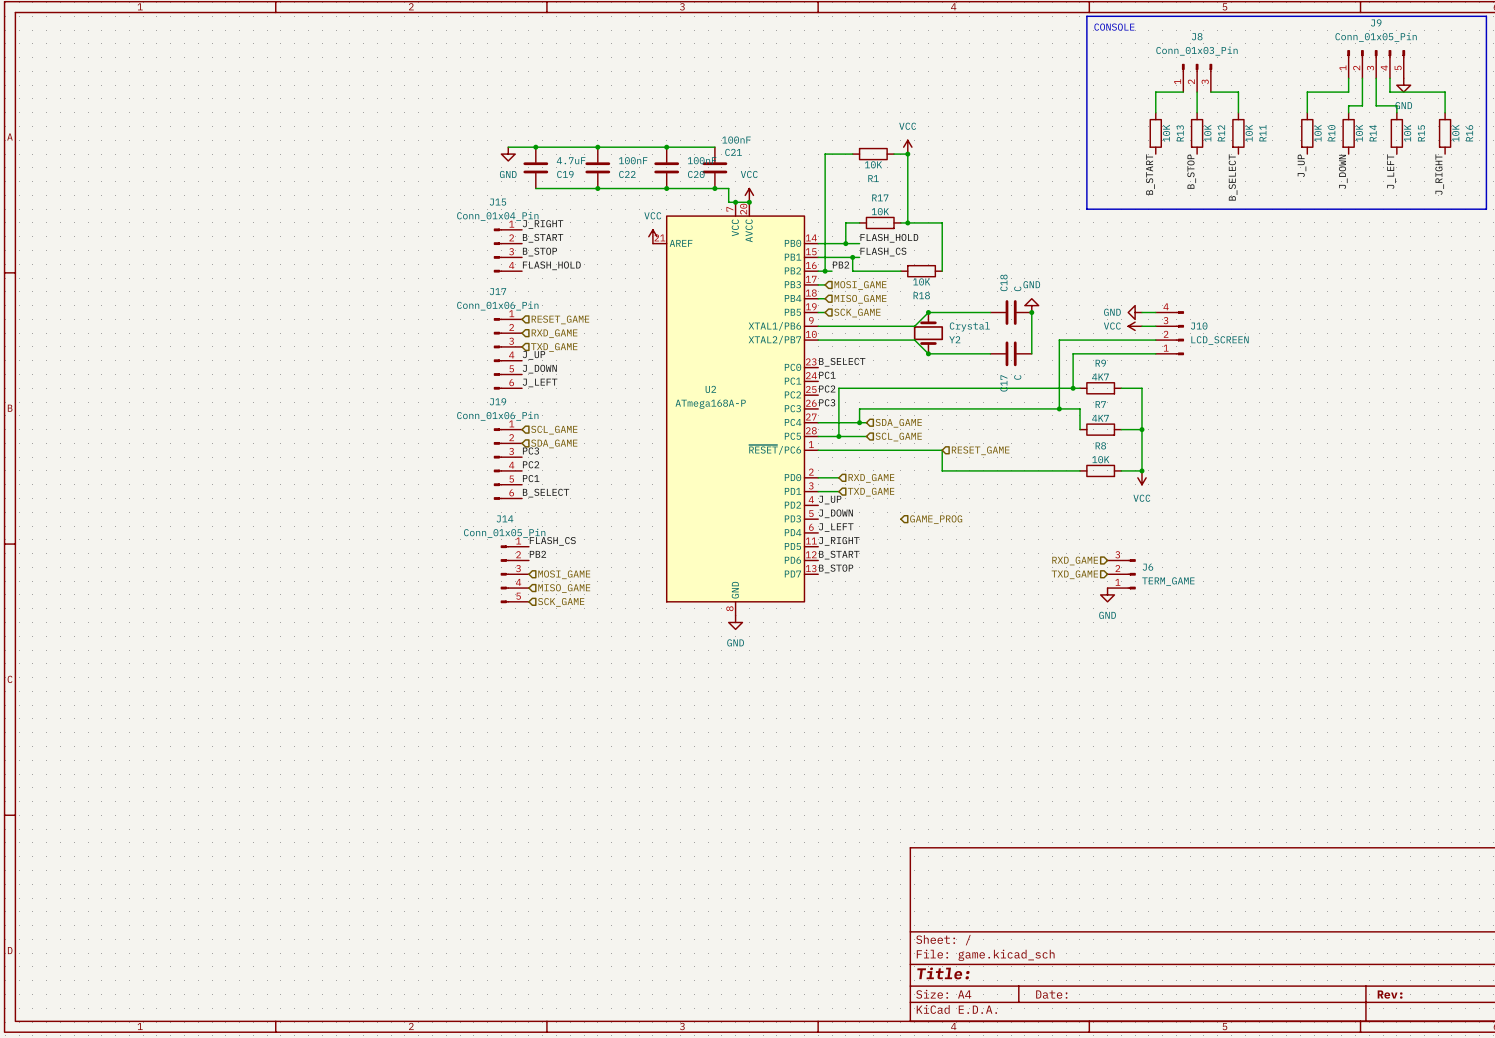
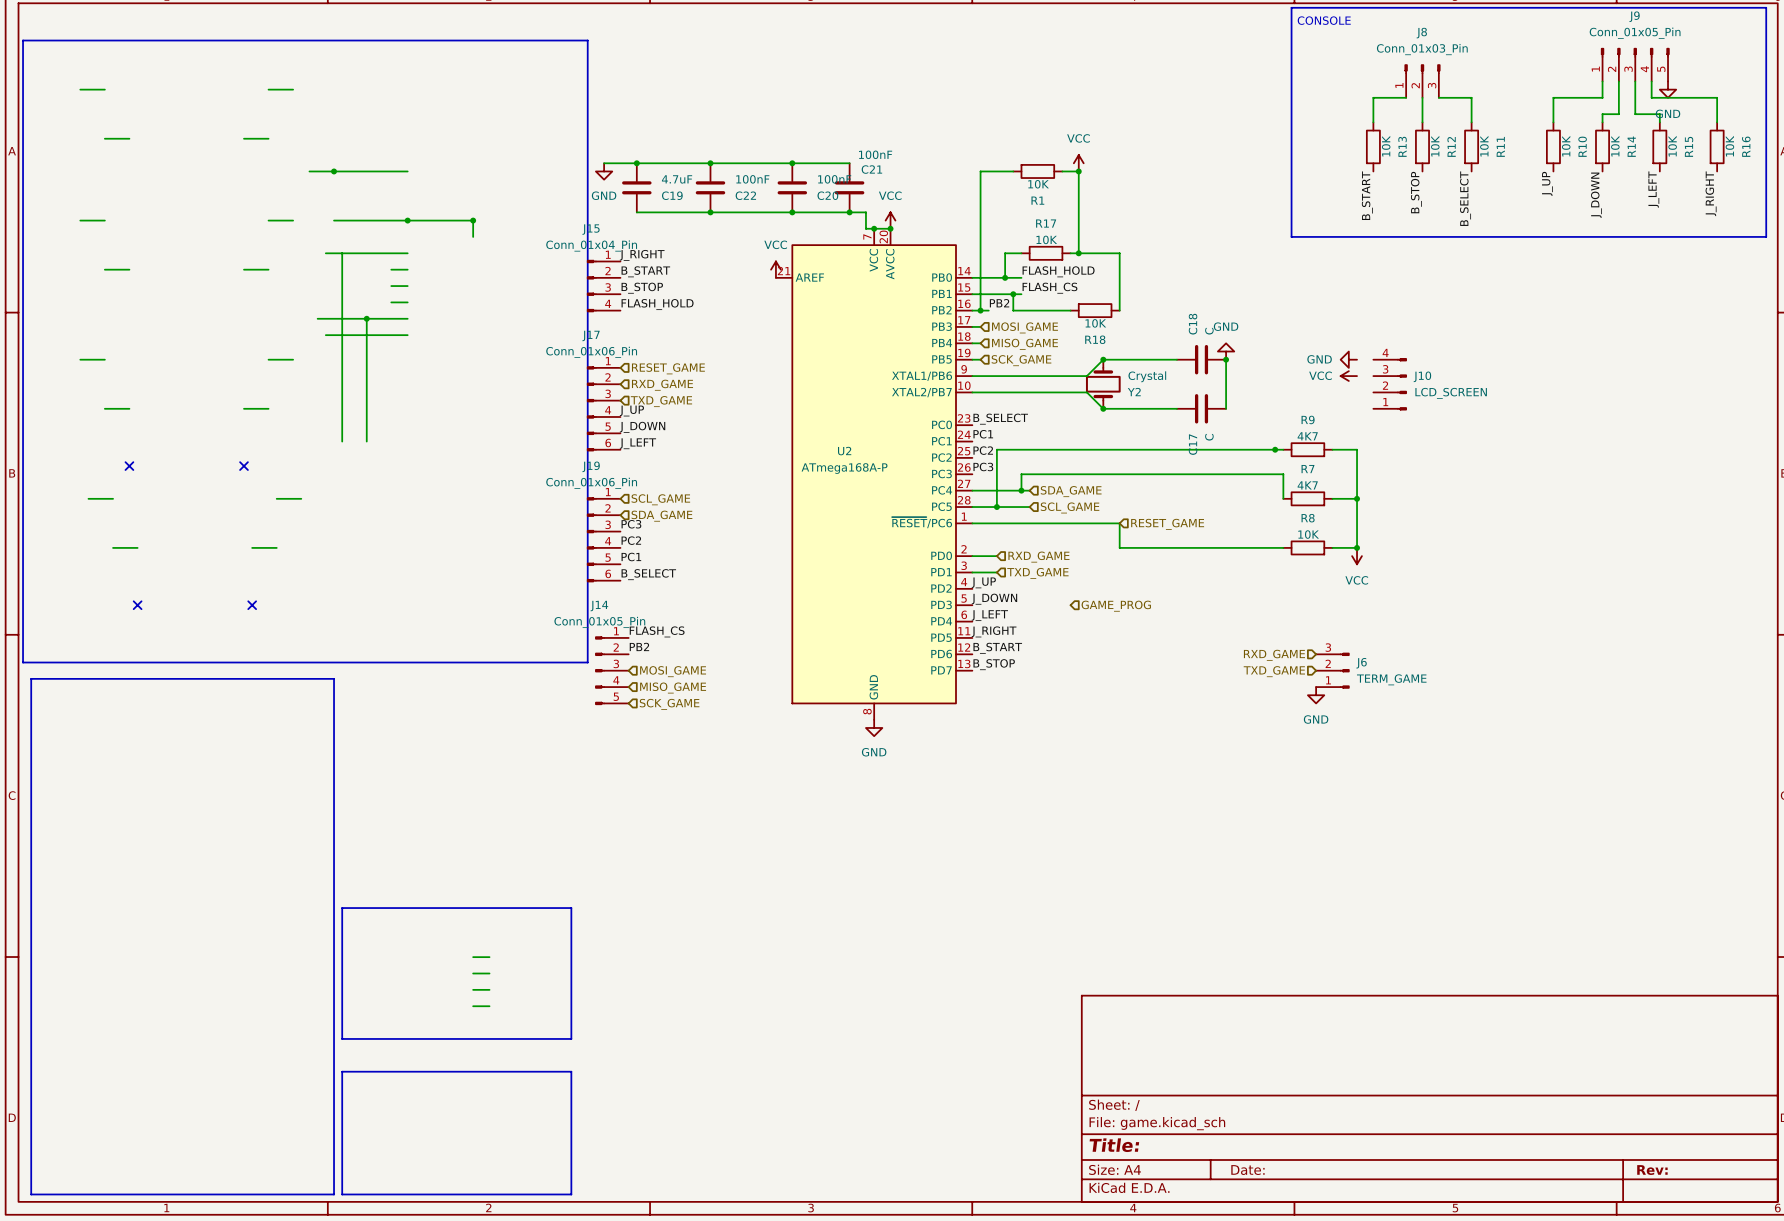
line: none -> (23, 40) (587, 40) (587, 662) (23, 662) (23, 40)
wire: none -> (80, 89) (104, 89)
wire: none -> (268, 89) (293, 89)
wire: none -> (104, 138) (129, 138)
wire: none -> (243, 138) (268, 138)
wire: none -> (309, 171) (407, 171)
junction: none -> (334, 171)
wire: none -> (80, 220) (104, 220)
wire: none -> (268, 220) (293, 220)
wire: none -> (334, 220) (473, 220) (473, 236)
junction: none -> (407, 220)
junction: none -> (473, 220)
wire: none -> (325, 253) (407, 253)
wire: none -> (342, 253) (342, 441)
wire: none -> (104, 269) (129, 269)
wire: none -> (243, 269) (268, 269)
wire: none -> (391, 269) (407, 269)
wire: none -> (391, 286) (407, 286)
wire: none -> (391, 302) (407, 302)
wire: none -> (317, 318) (407, 318)
wire: none -> (366, 318) (366, 441)
junction: none -> (366, 318)
wire: none -> (325, 335) (407, 335)
wire: none -> (80, 359) (104, 359)
wire: none -> (268, 359) (293, 359)
wire: (1141, 312) (1155, 312) -> none
wire: (1141, 326) (1155, 326) -> none
wire: (1155, 340) (1059, 340) (1059, 408) -> none
wire: none -> (104, 408) (129, 408)
wire: none -> (243, 408) (268, 408)
wire: (1155, 353) (1073, 353) (1073, 388) -> none
no-connect mark: none -> (129, 466)
no-connect mark: none -> (243, 466)
junction: (1059, 408) -> none
wire: none -> (88, 498) (113, 498)
wire: none -> (276, 498) (301, 498)
wire: none -> (113, 547) (137, 547)
wire: none -> (252, 547) (276, 547)
no-connect mark: none -> (137, 605)
no-connect mark: none -> (252, 605)
line: none -> (31, 678) (334, 678) (334, 1194) (31, 1194) (31, 678)
line: none -> (342, 908) (571, 908) (571, 1038) (342, 1038) (342, 908)
wire: none -> (473, 957) (489, 957)
wire: none -> (473, 973) (489, 973)
wire: none -> (473, 989) (489, 989)
wire: none -> (473, 1006) (489, 1006)
line: none -> (342, 1071) (342, 1194) (571, 1194) (571, 1071) (342, 1071)

